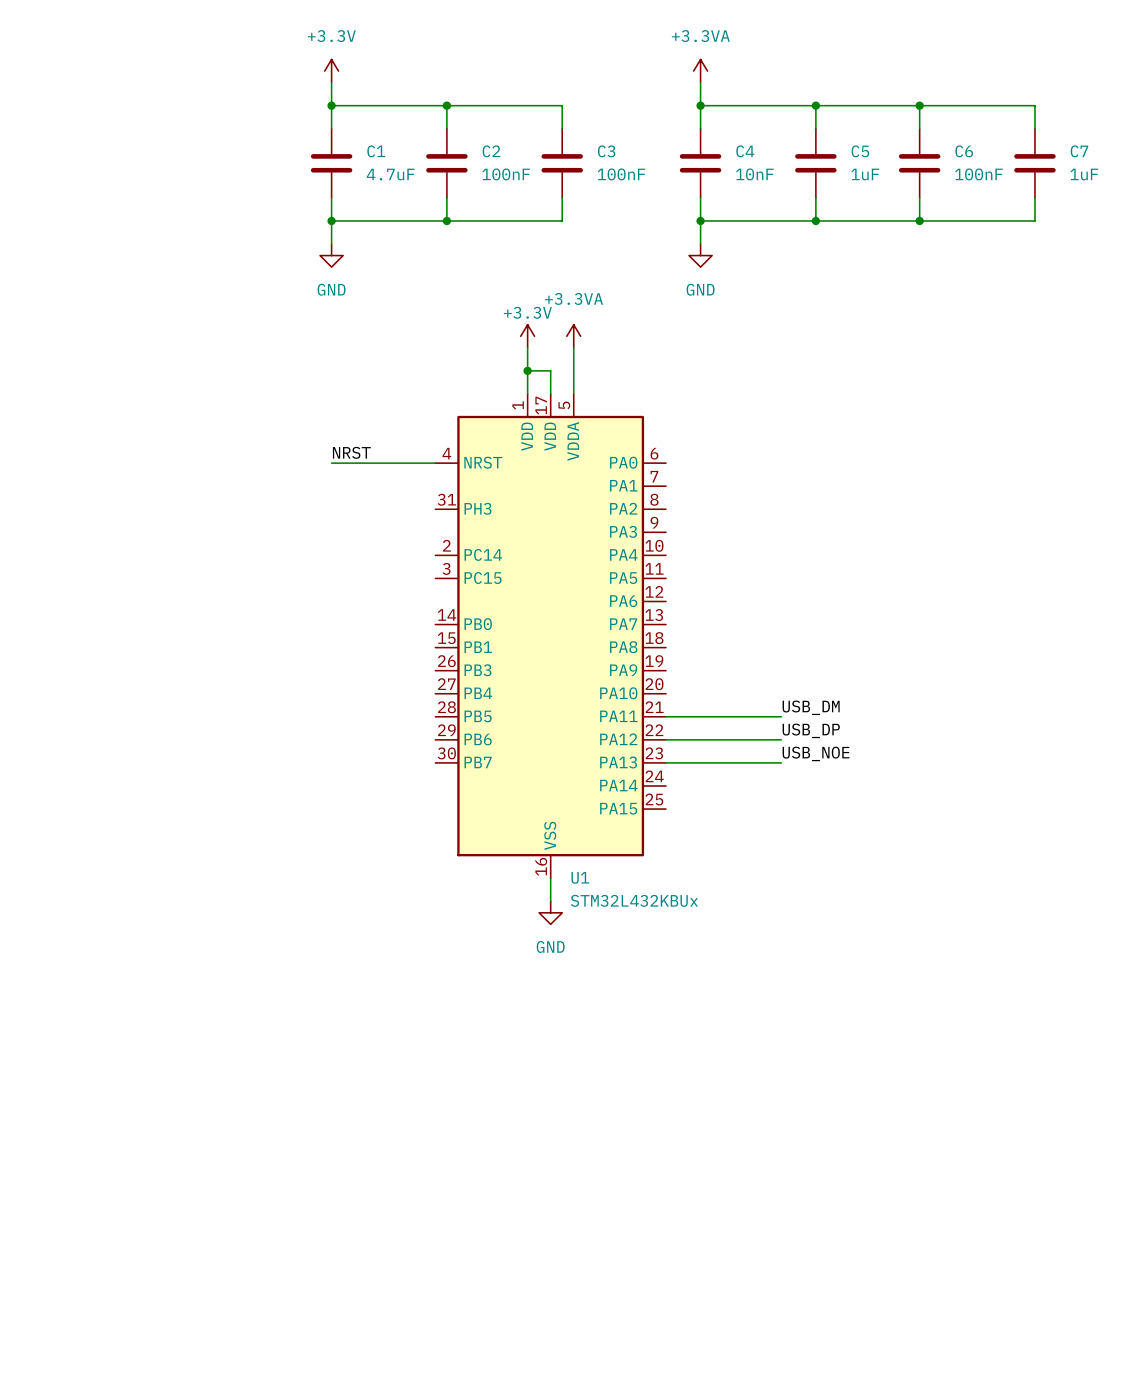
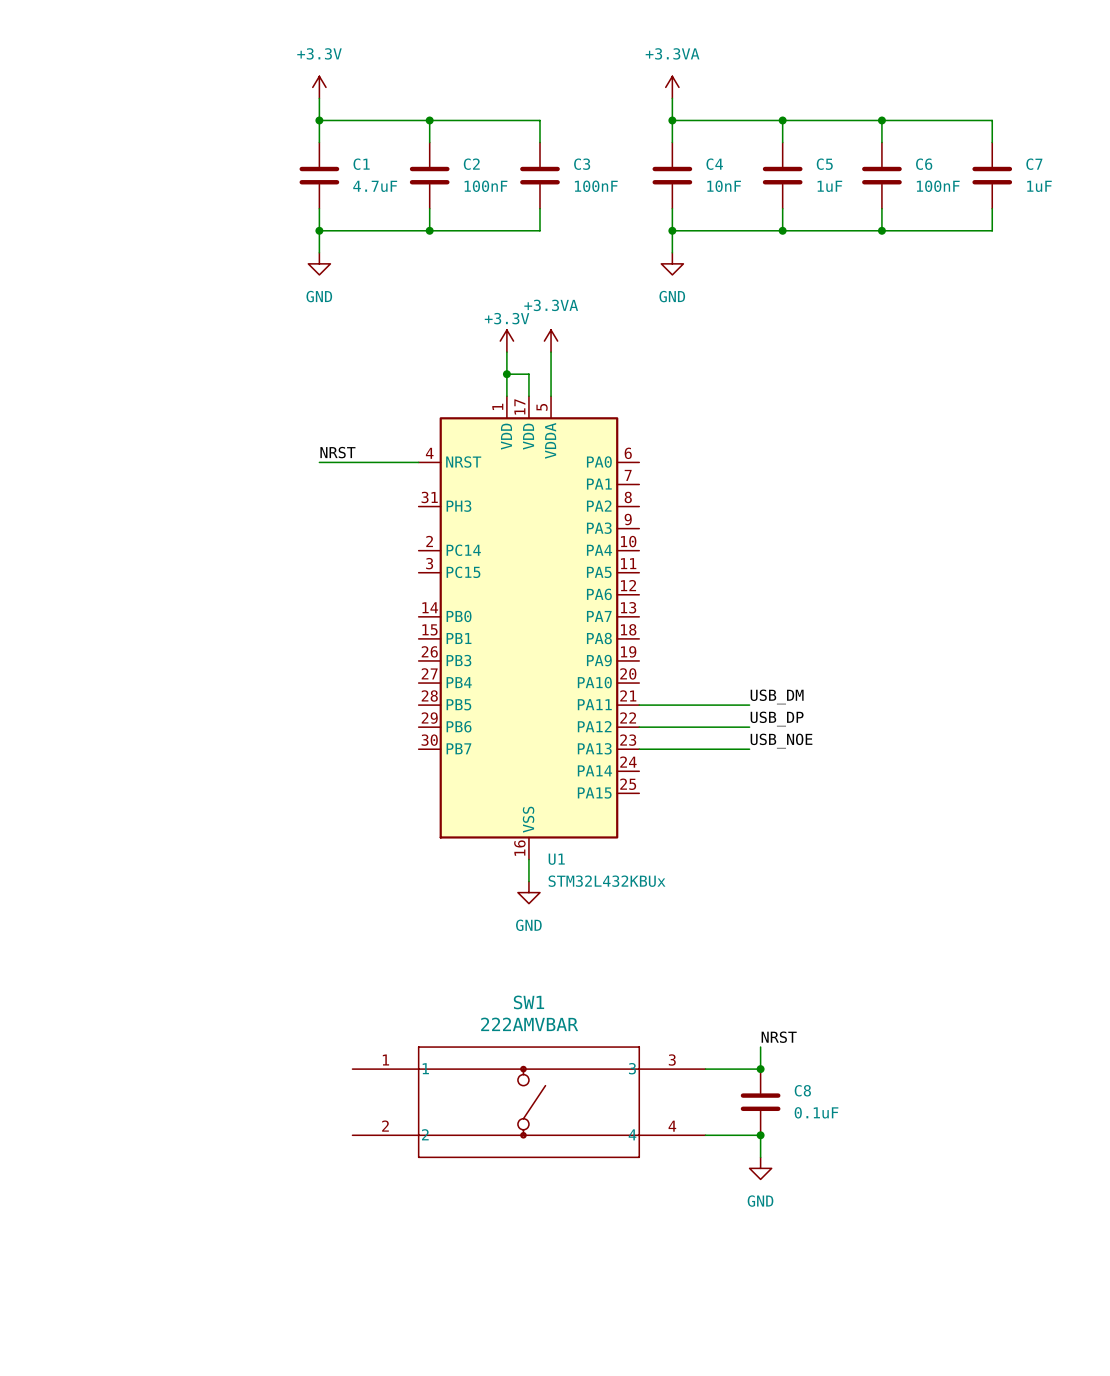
label: none -> NRST (779, 1037)
wire: none -> (760, 1047) (760, 1069) (705, 1069)
junction: none -> (760, 1069)
SW1: none -> 222AMVBAR (528, 1102)
C8: none -> 0.1uF (760, 1102)
wire: none -> (705, 1135) (760, 1135) (760, 1157)
junction: none -> (760, 1135)
power symbol: none -> GND (760, 1168)

